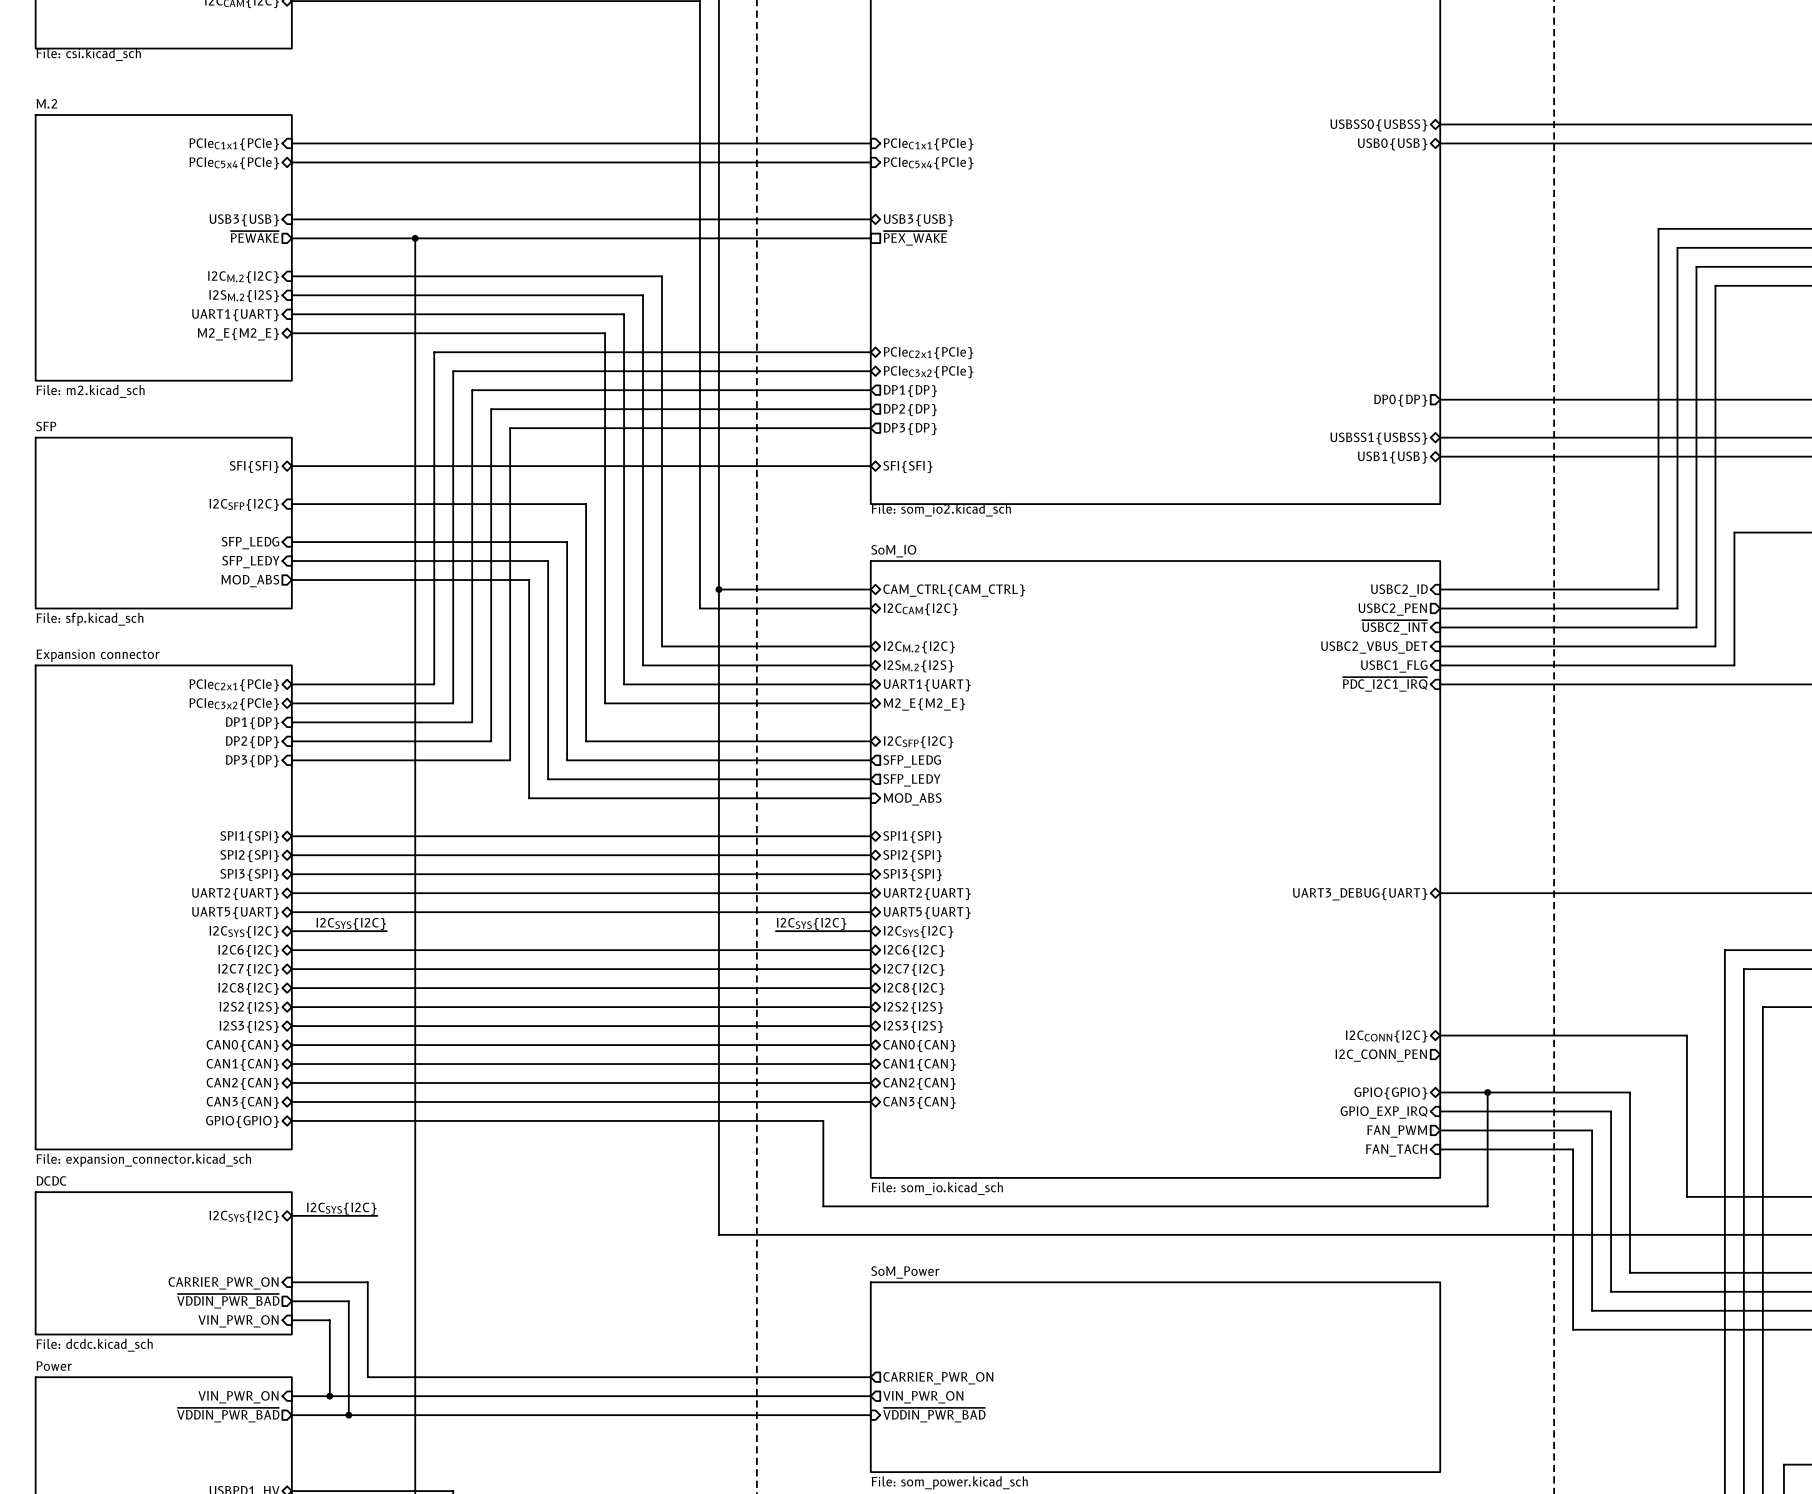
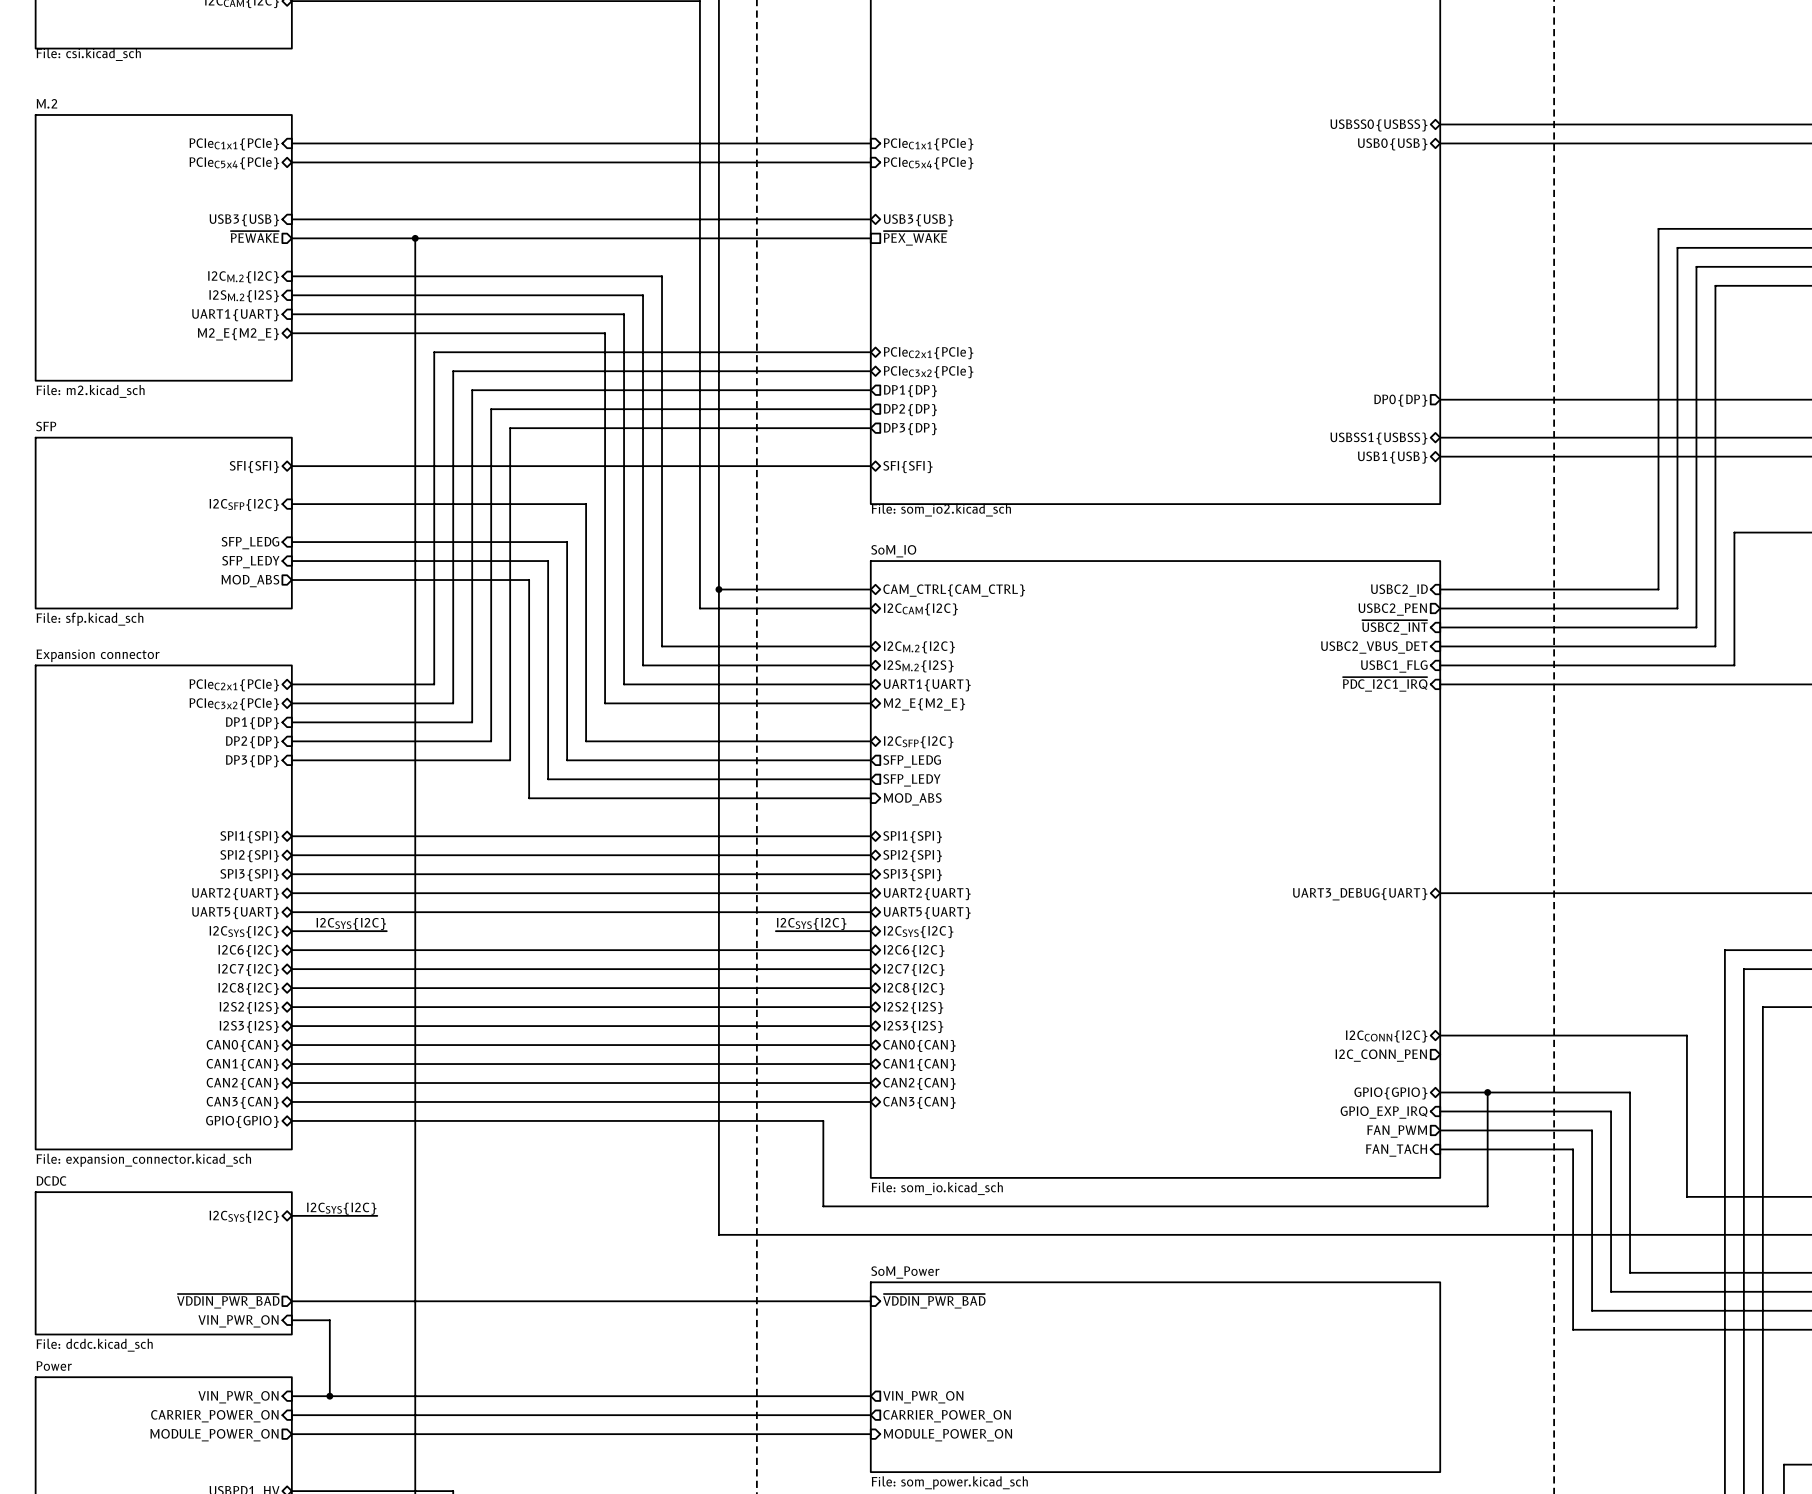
wire: (291, 1282) (367, 1282) (367, 1377) (870, 1377) -> none
sheet pin: CARRIER_PWR_ON (223, 1283) -> none
wire: (348, 1301) (348, 1415) -> (348, 1301) (870, 1301)
sheet pin: none -> ~{VDDIN_PWR_BAD} (934, 1301)
sheet pin: CARRIER_PWR_ON (938, 1378) -> none
sheet pin shape: output (228, 1415) -> input (214, 1416)
sheet pin: ~{VDDIN_PWR_BAD} (228, 1415) -> CARRIER_POWER_ON (214, 1416)
junction: (348, 1415) -> none
sheet pin shape: input (934, 1415) -> output (947, 1416)
sheet pin: ~{VDDIN_PWR_BAD} (934, 1415) -> CARRIER_POWER_ON (947, 1416)
wire: none -> (291, 1434) (870, 1434)
sheet pin: none -> MODULE_POWER_ON (214, 1435)
sheet pin: none -> MODULE_POWER_ON (947, 1435)

